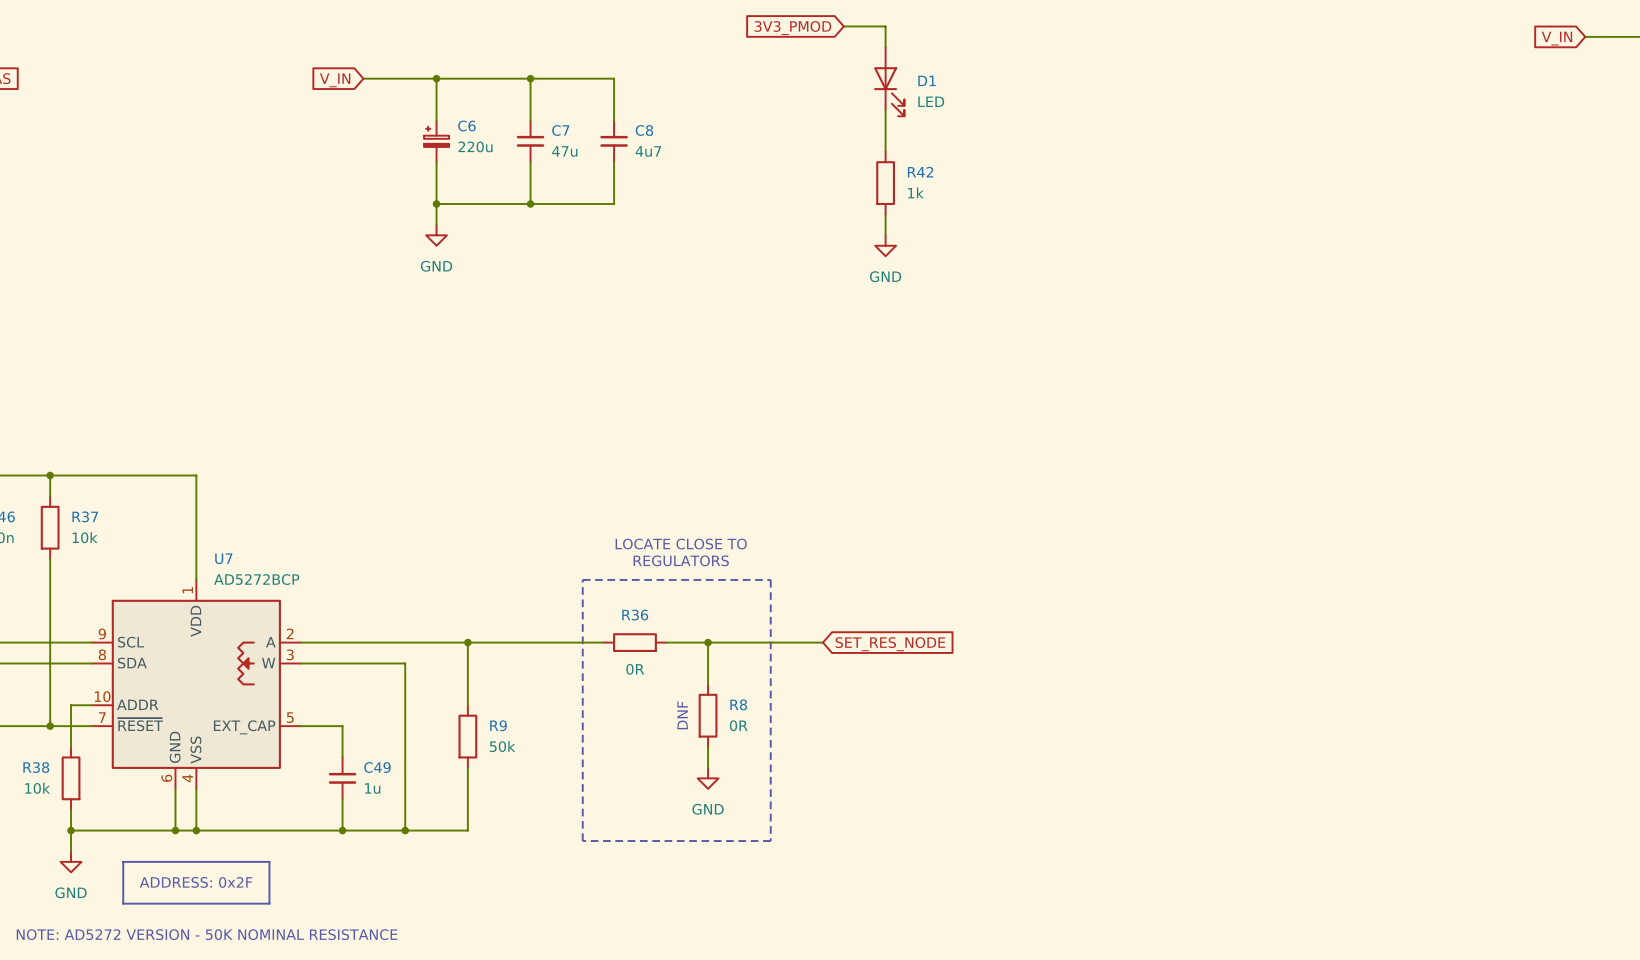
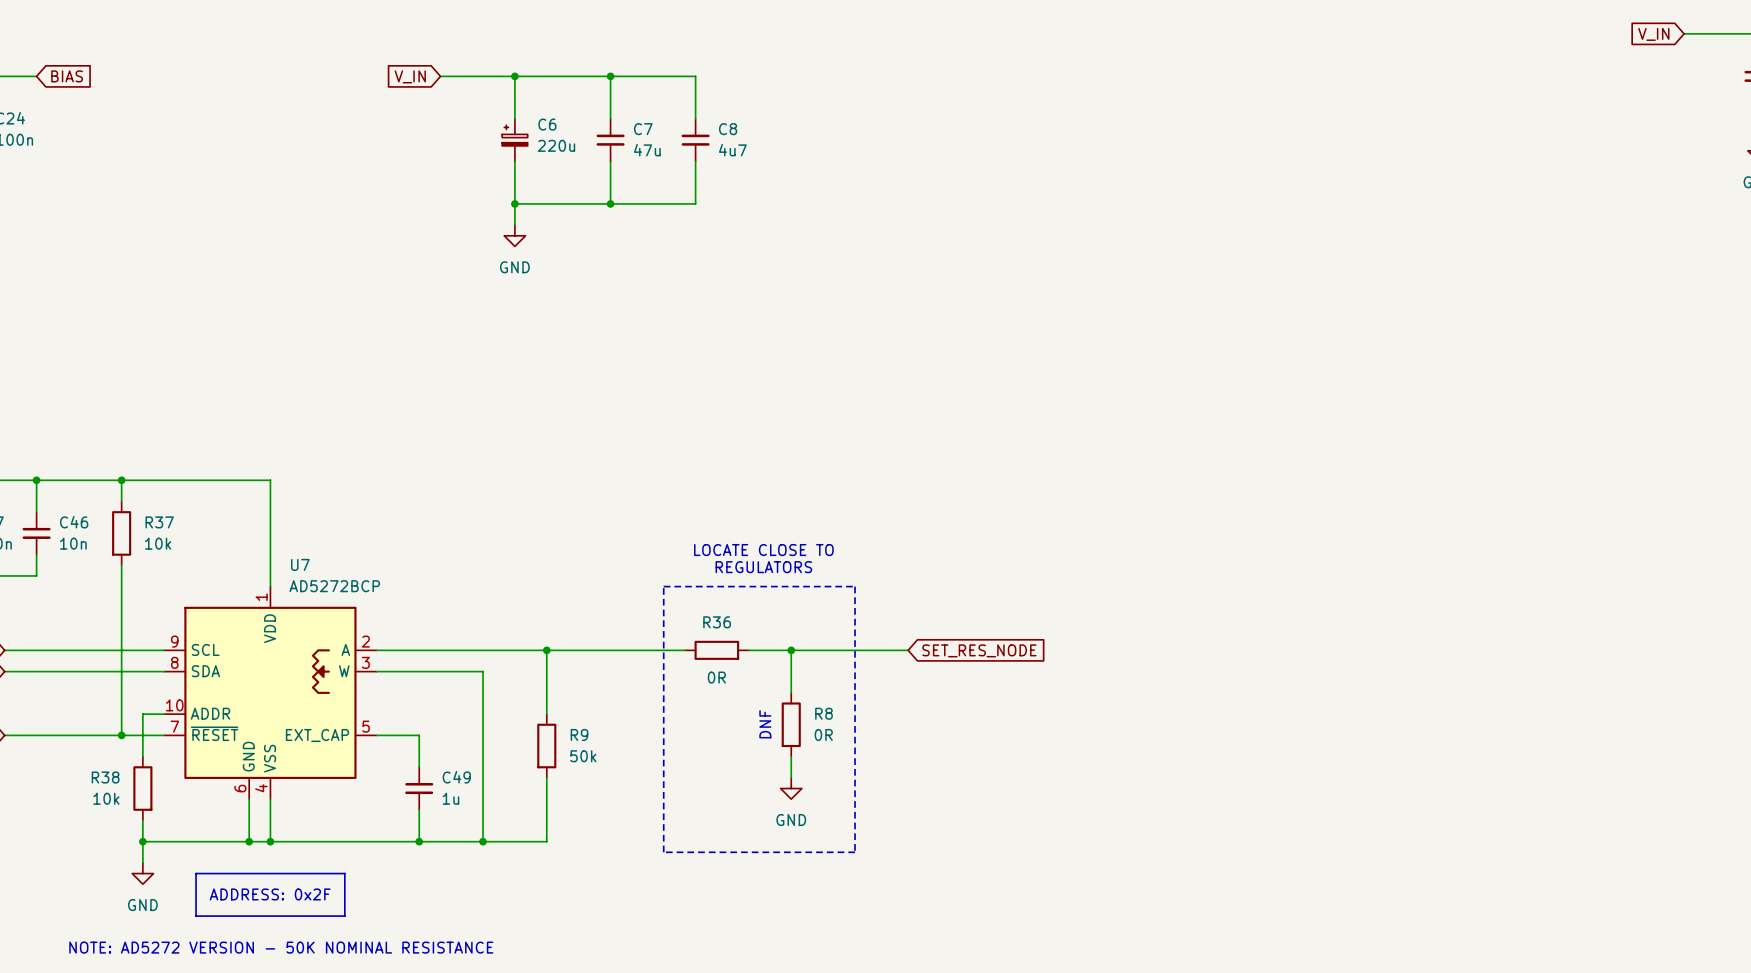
wire: (843, 26) (885, 26) (885, 47) -> none
global label: 3V3_PMOD (792, 28) -> none
D1: LED (889, 81) -> none
wire: (885, 110) (885, 151) -> none
R42: 1k (885, 183) -> none
wire: (885, 214) (885, 235) -> none
power symbol: GND (885, 245) -> none

